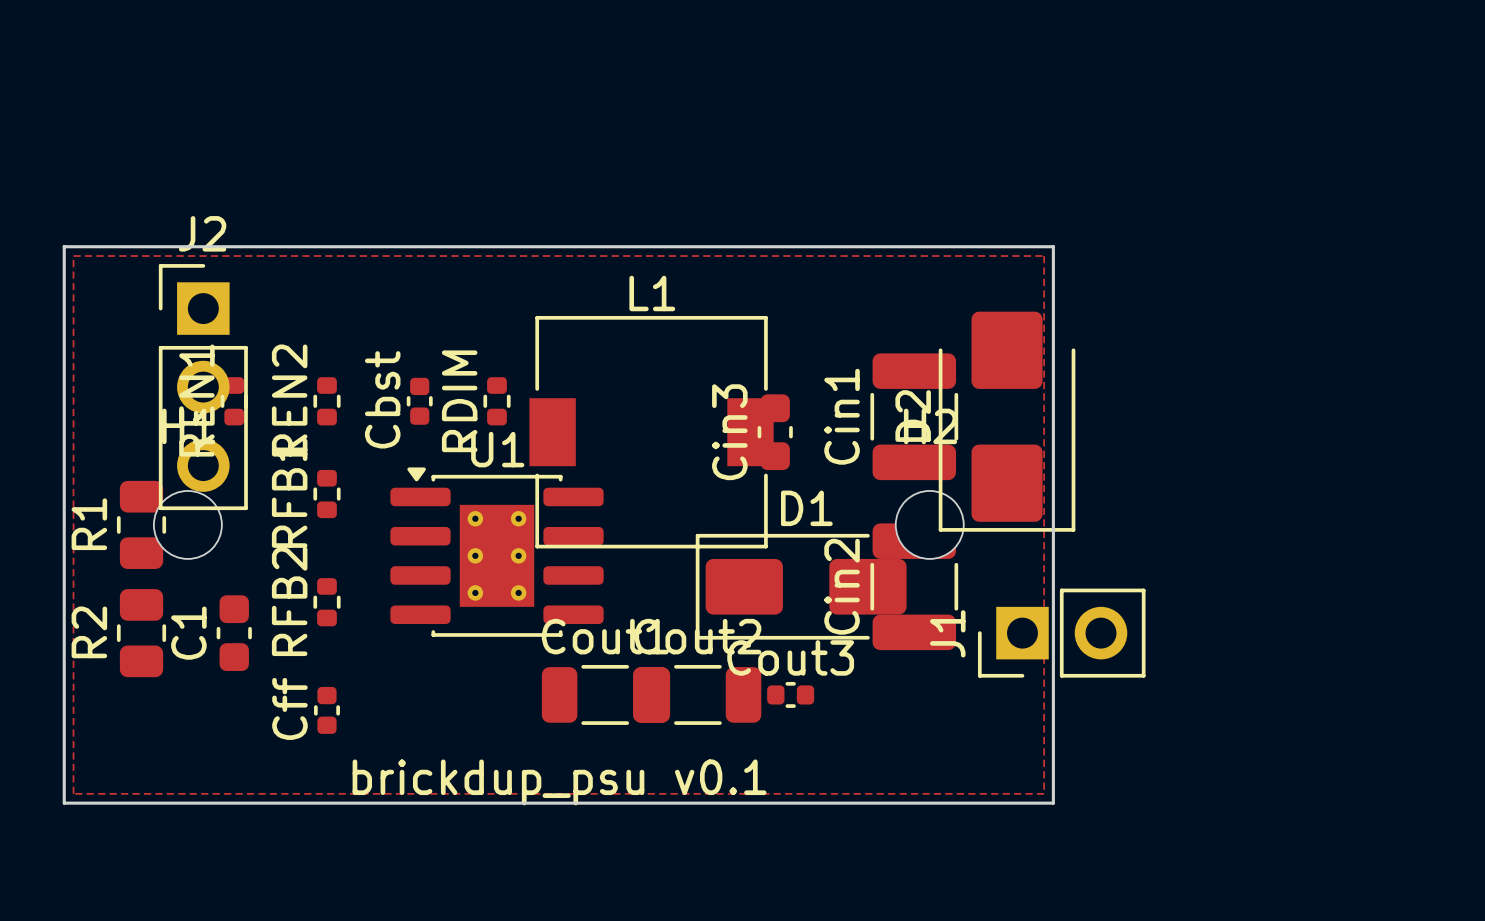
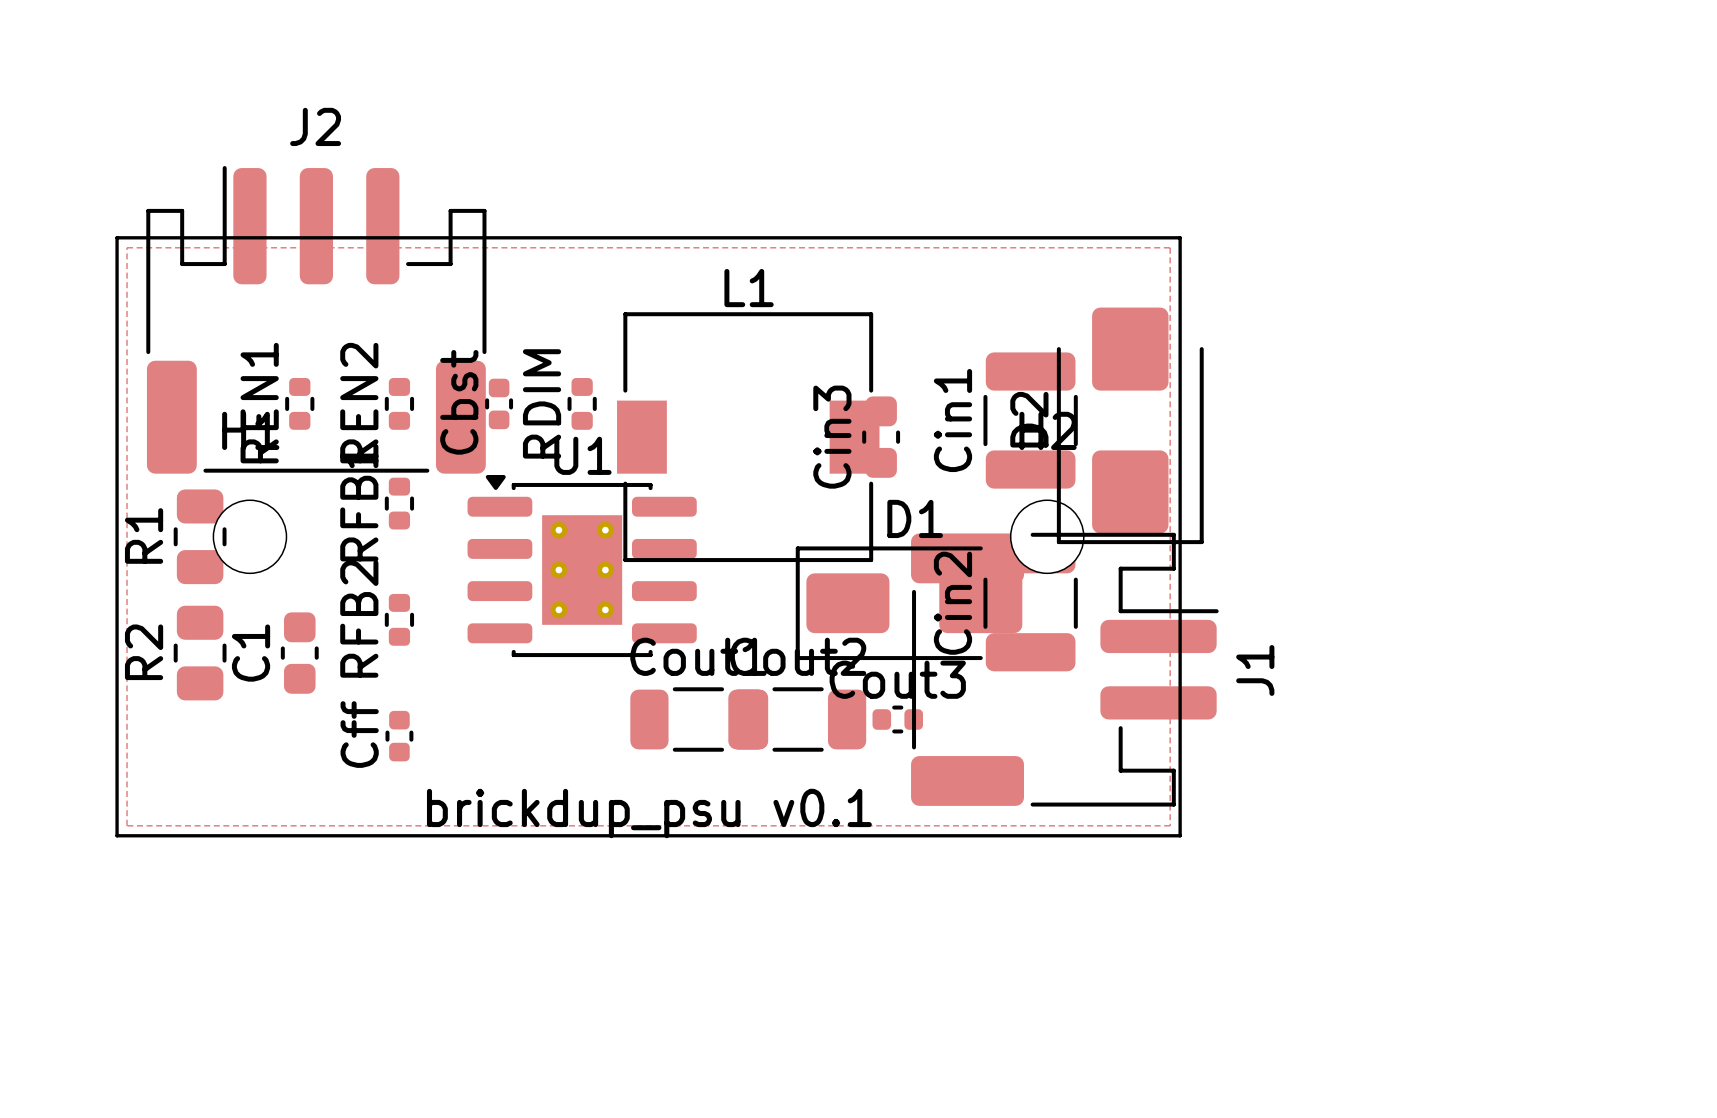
J2 footprint: [158, 264, 248, 511] -> [146, 166, 487, 474]
J1 footprint: [977, 588, 1146, 678] -> [911, 532, 1219, 807]
J1 name position: J1 (947, 633) -> J1 (1255, 670)

